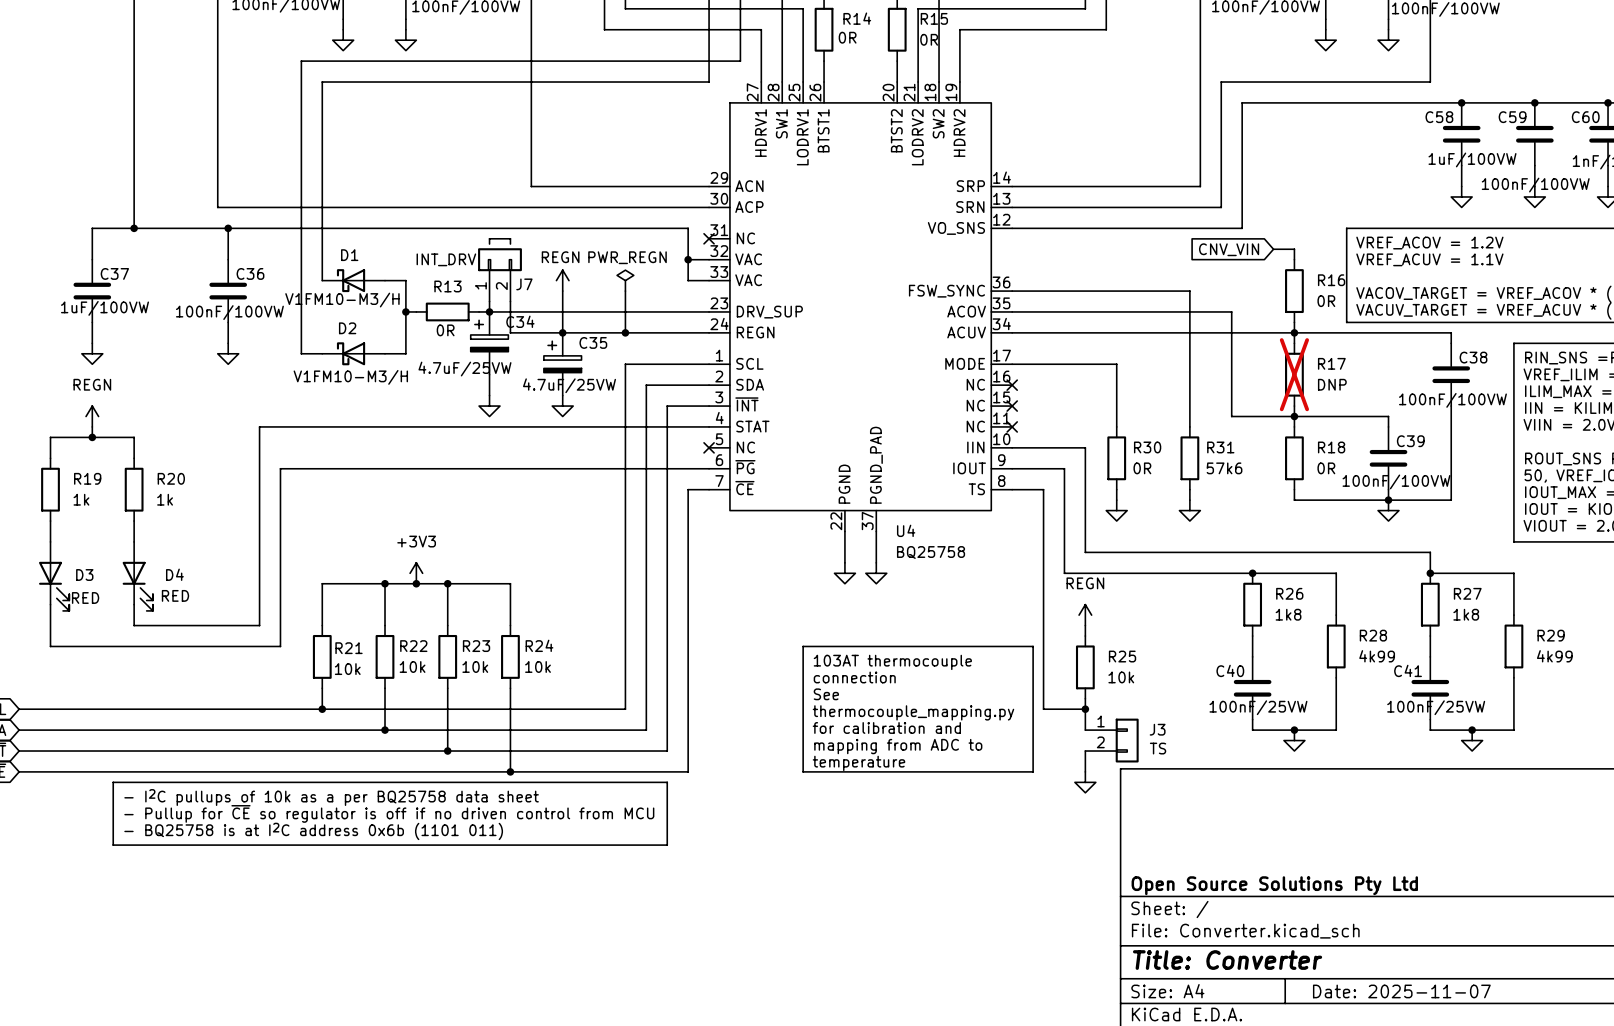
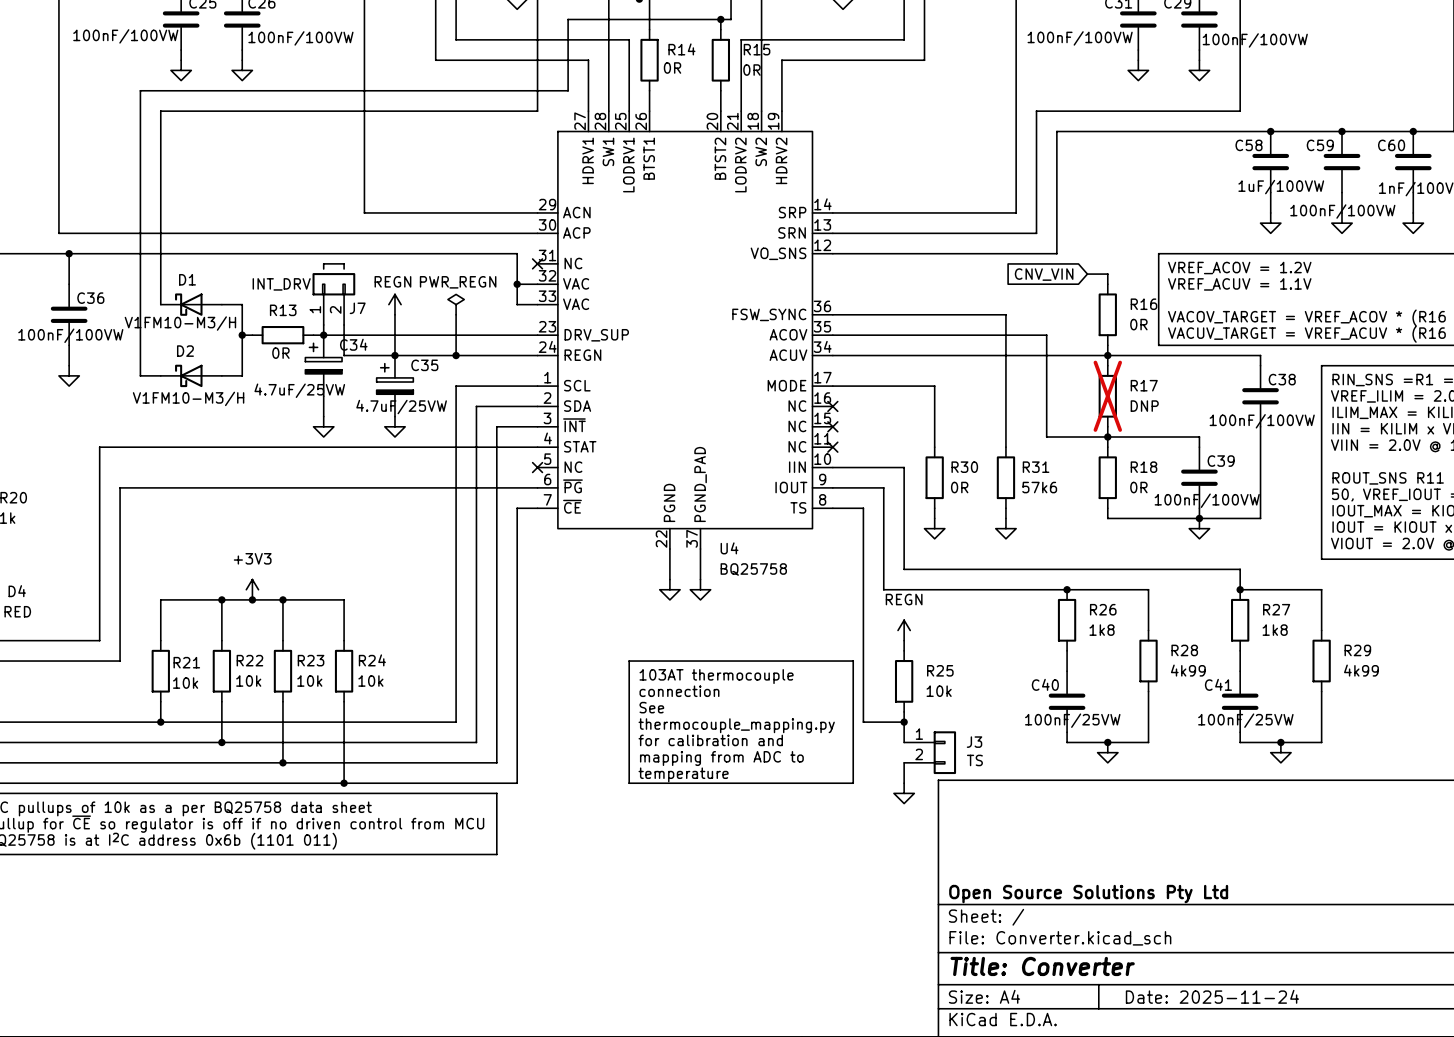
title block: Date: 2025-11-07 (1401, 991) -> Date: 2025-11-24 (1212, 996)

